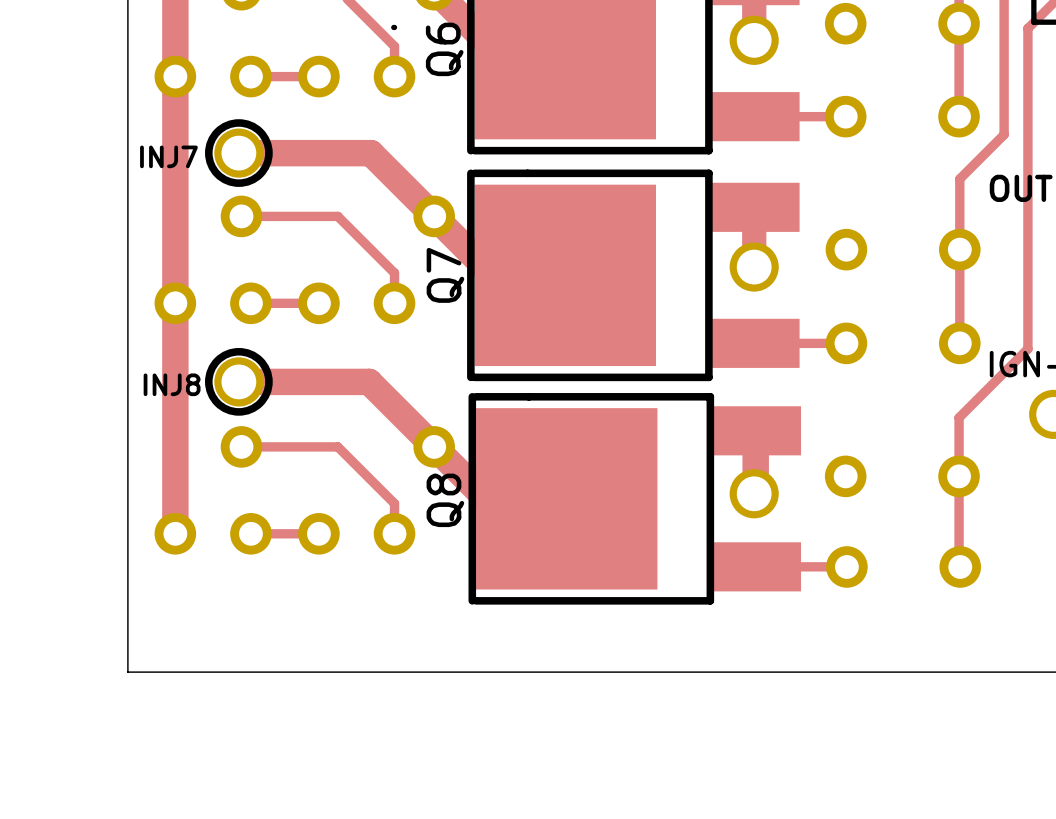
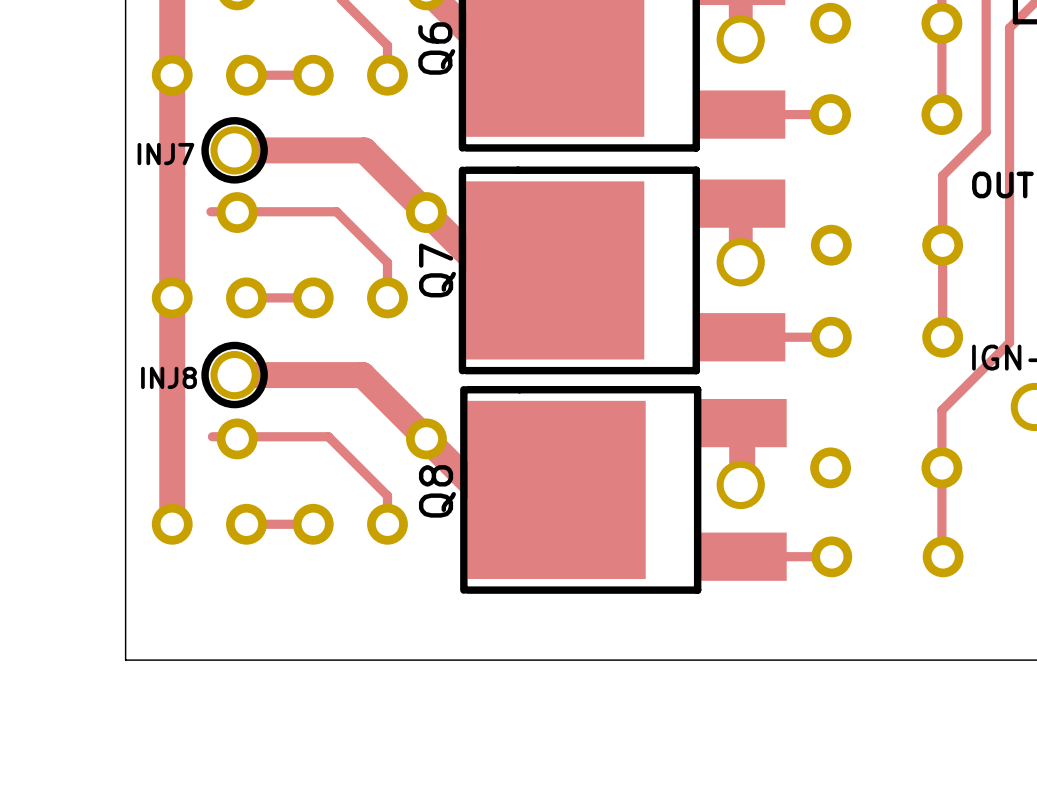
line: (393, 27) (394, 27) -> none
track: (241, 216) (337, 216) (394, 273) -> (210, 211) (336, 211) (387, 262) (387, 268)
track: (241, 446) (337, 446) (394, 504) -> (212, 436) (328, 436) (387, 495)

